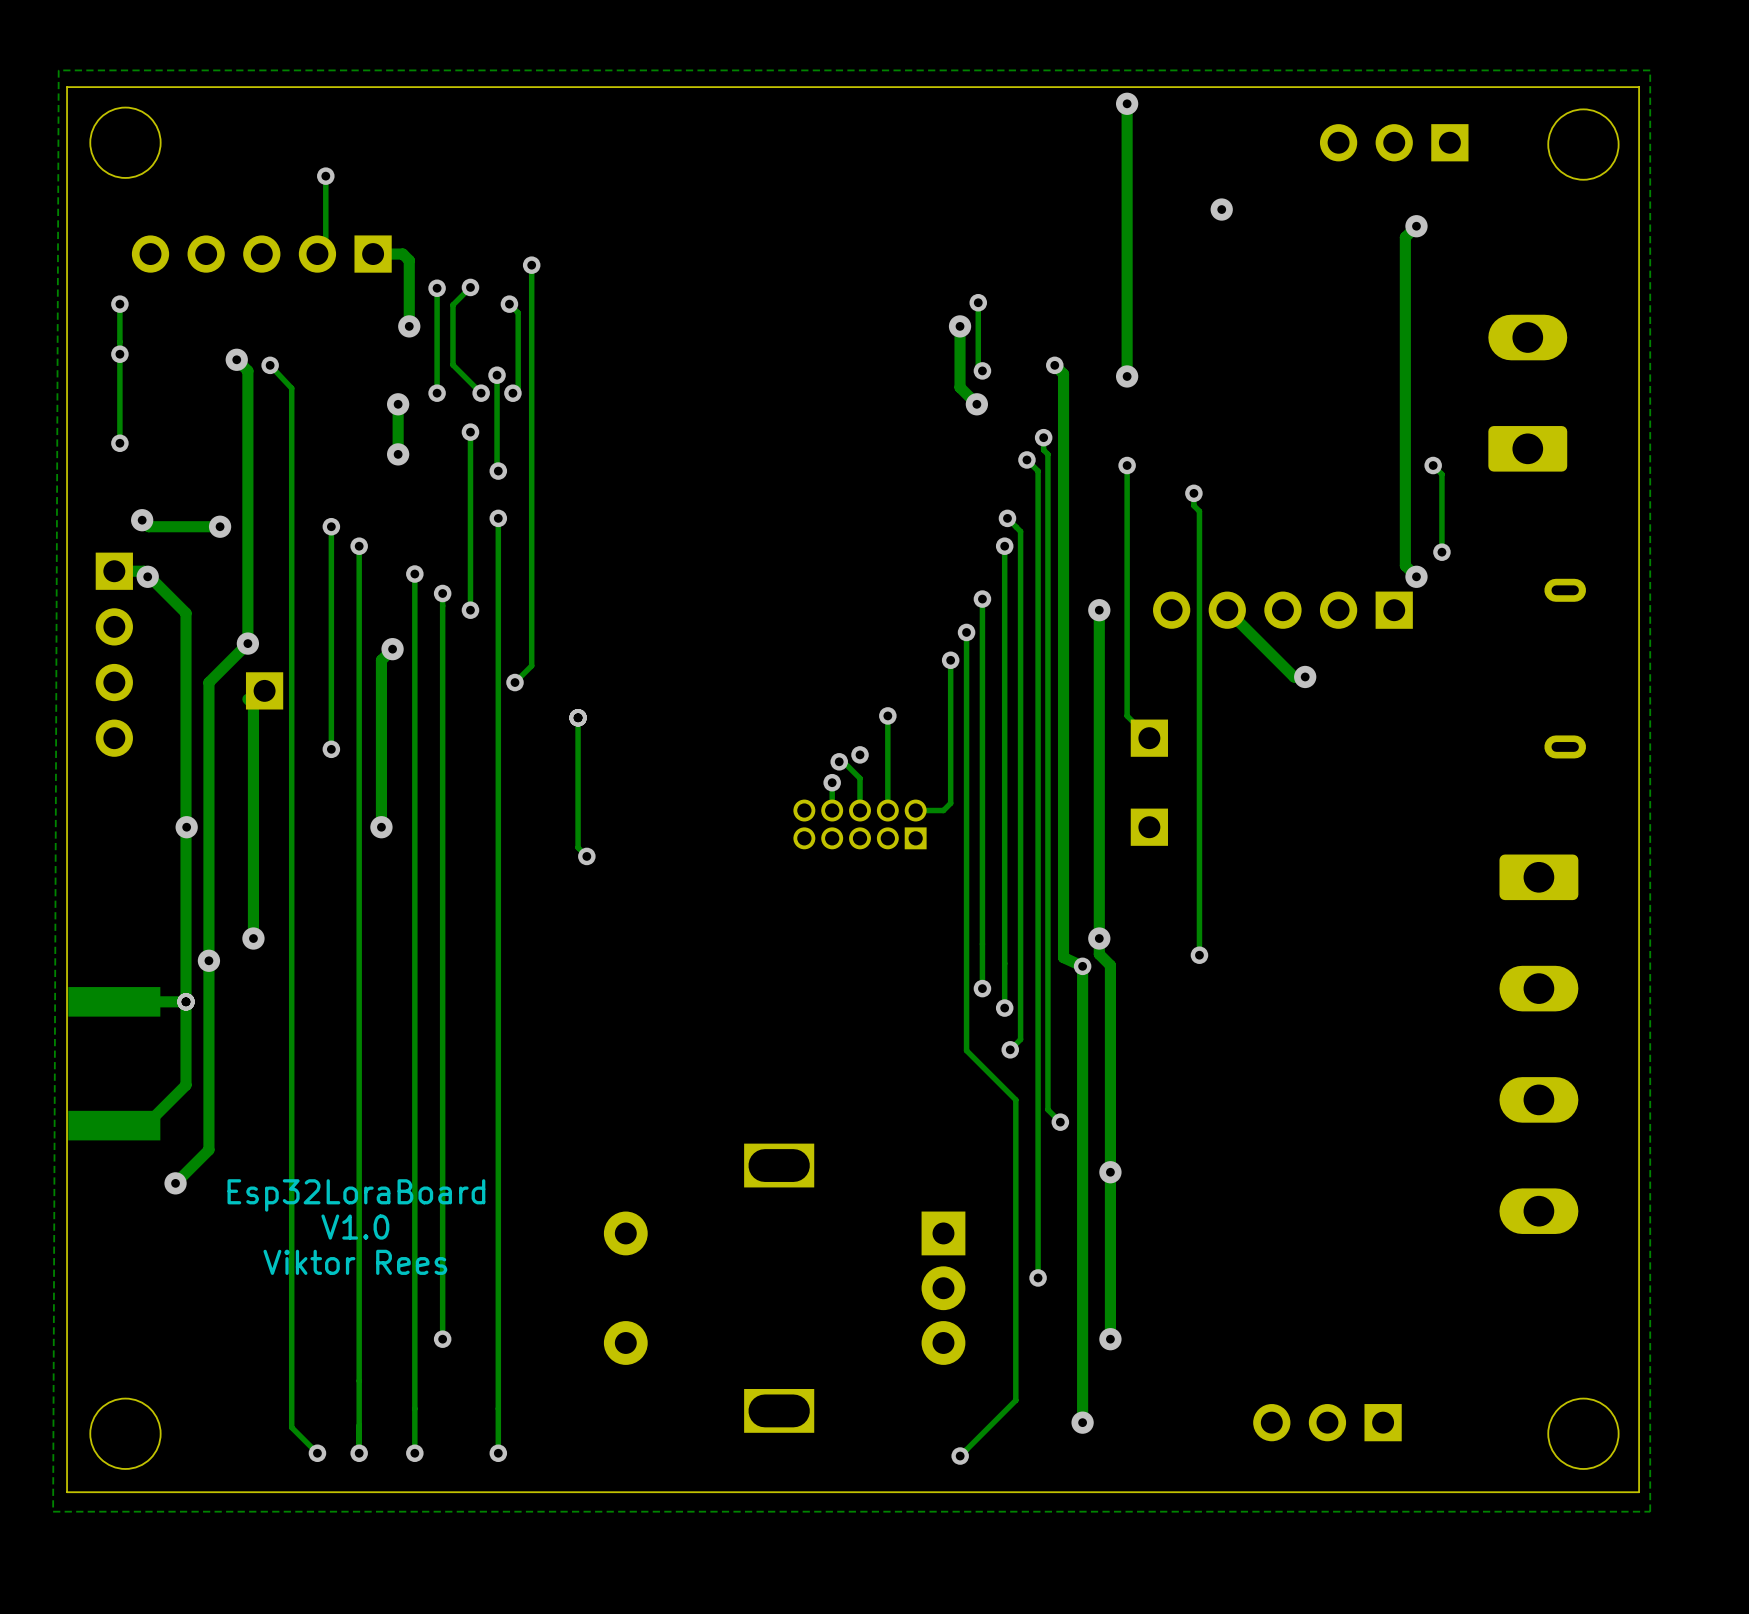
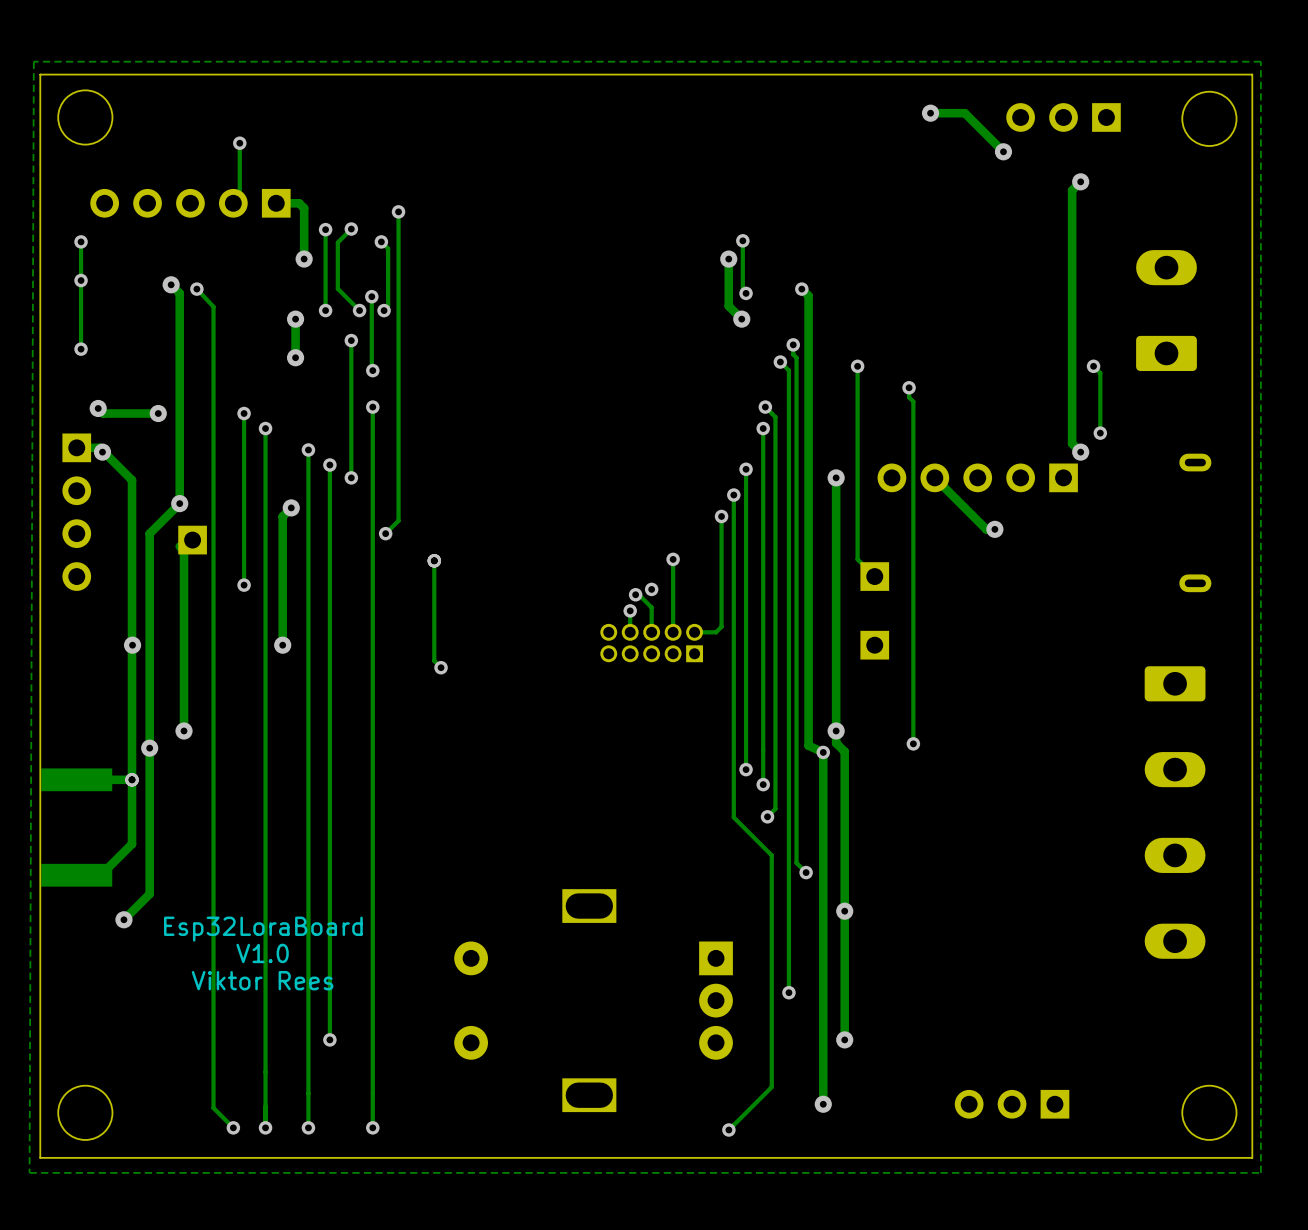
track: (1127, 103) (1127, 376) -> none
via: (1127, 103) -> none
track: none -> (930, 113) (964, 113) (1003, 151)
via: none -> (930, 113)
via: none -> (1003, 151)
via: (1221, 209) -> none
via: (1127, 376) -> none

